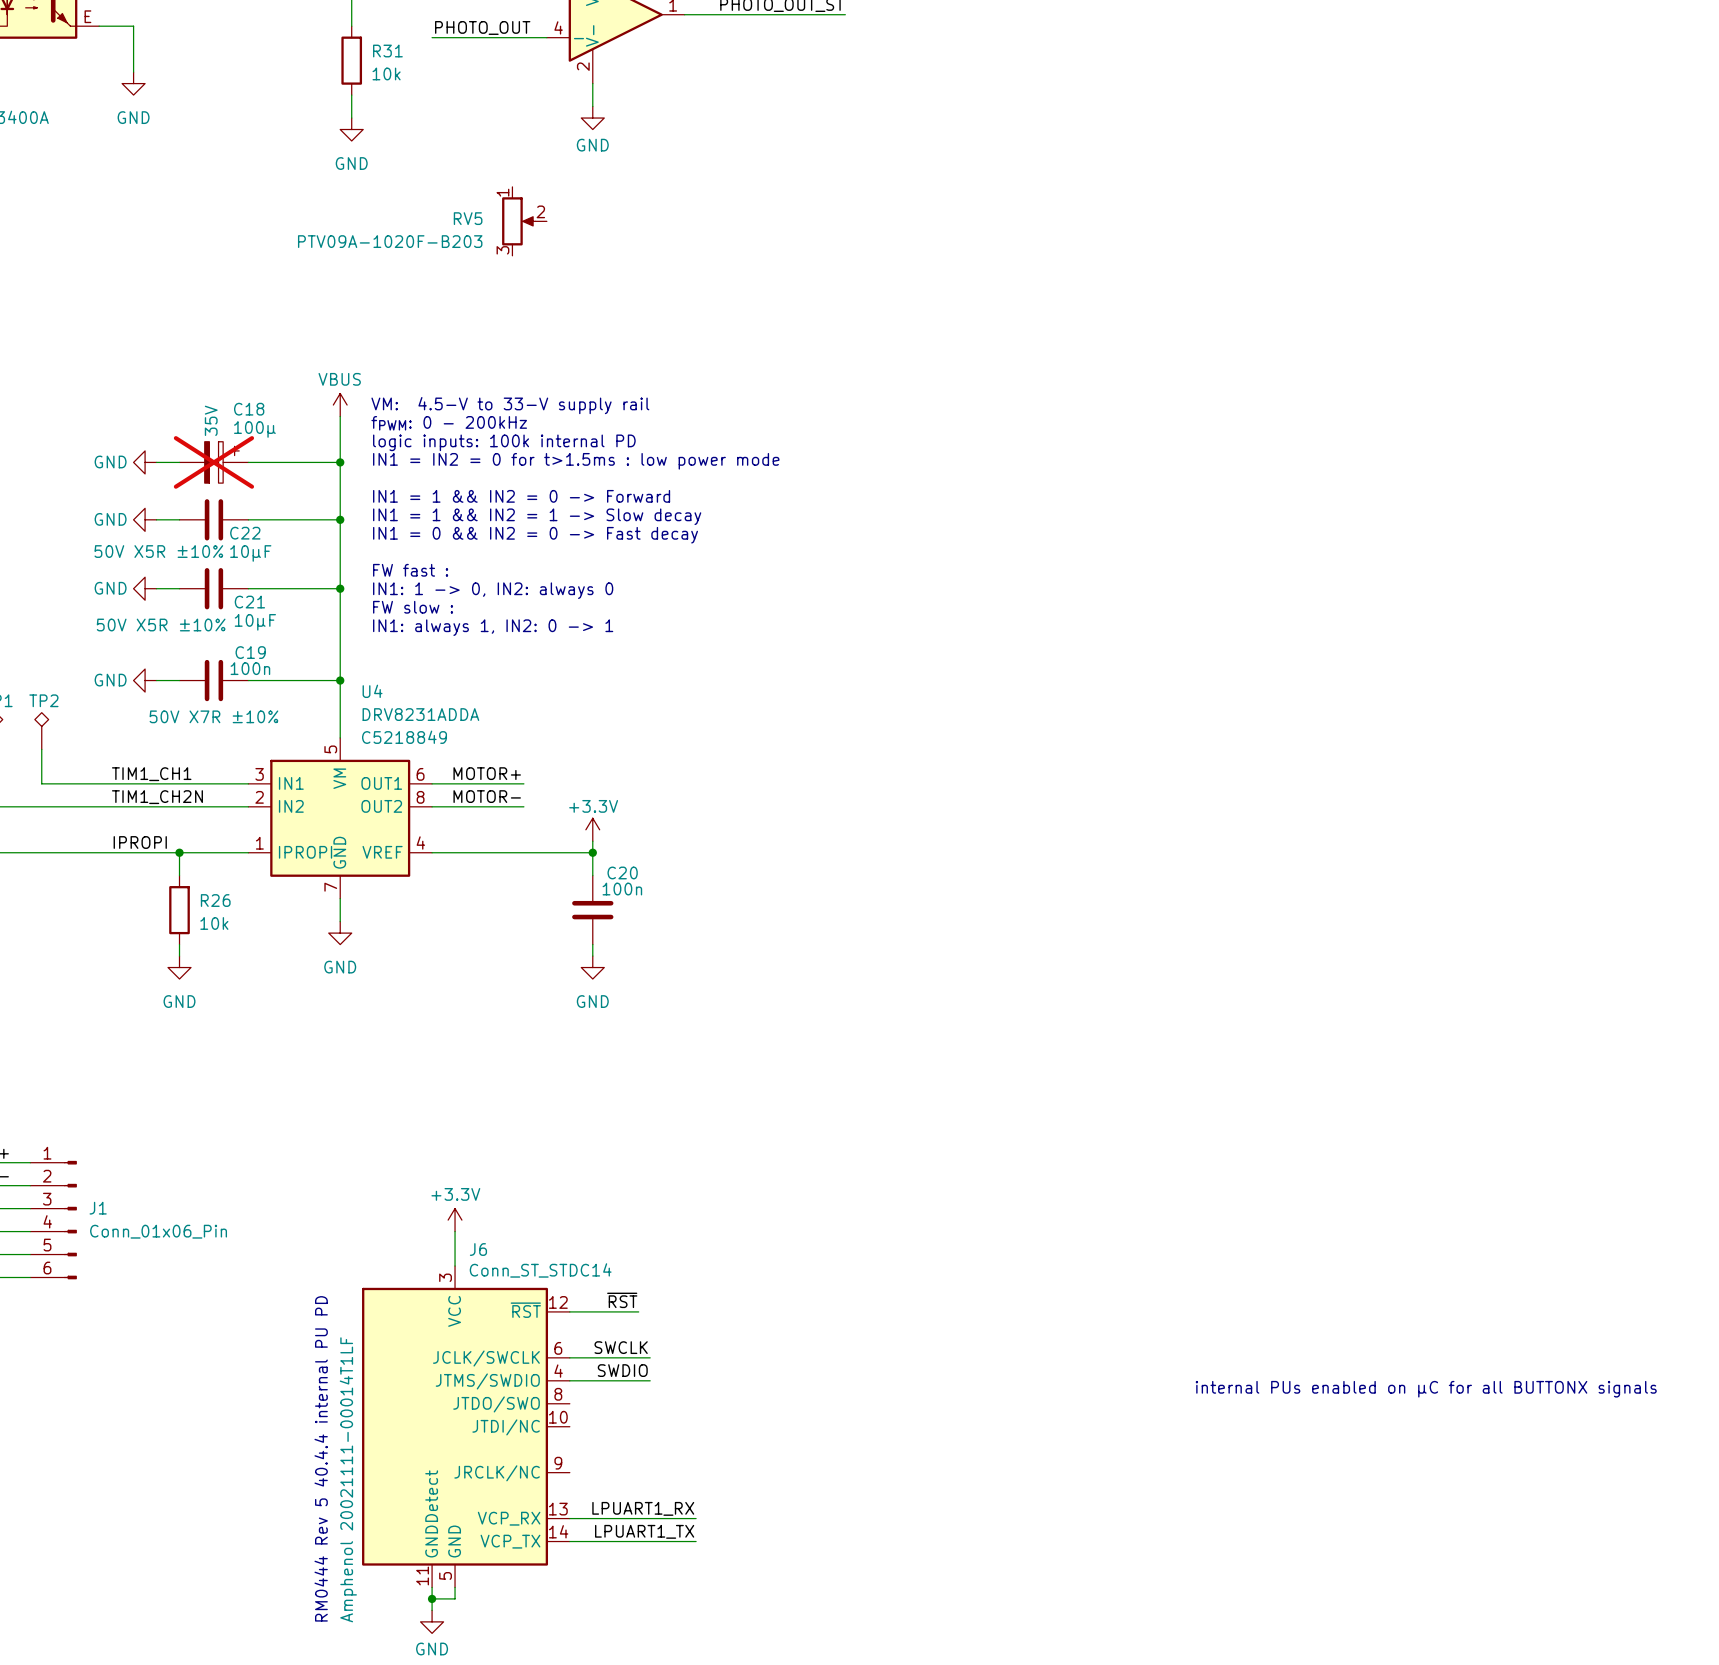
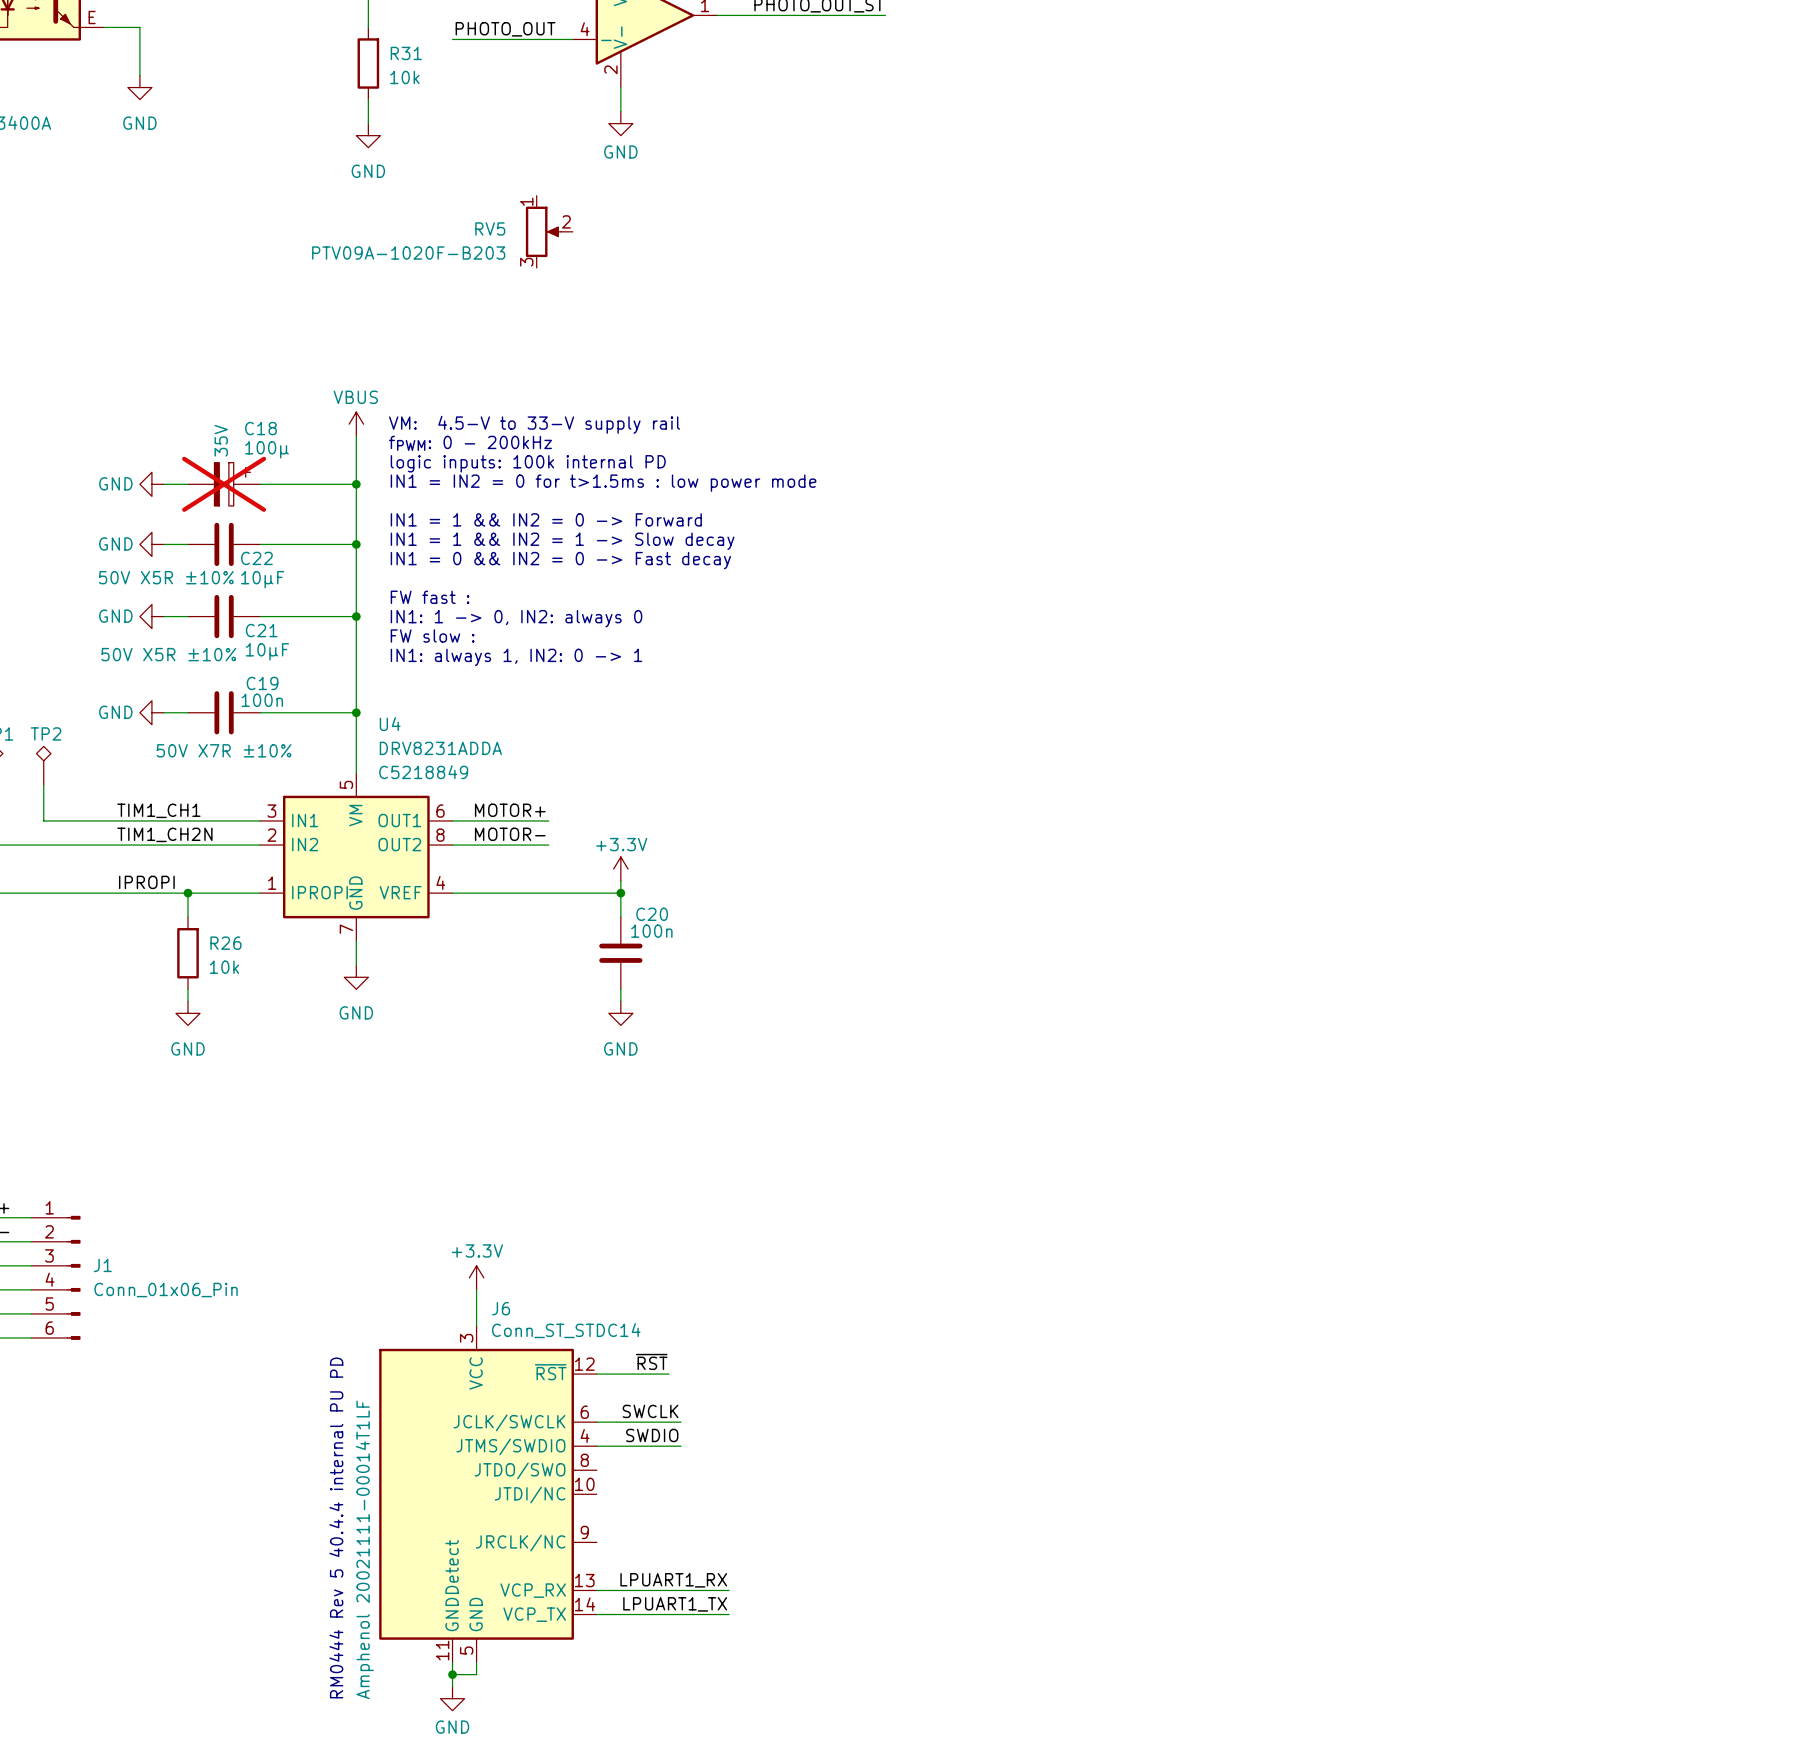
text: internal PUs enabled on µC for all BUTTONX signals (1426, 1389) -> none

